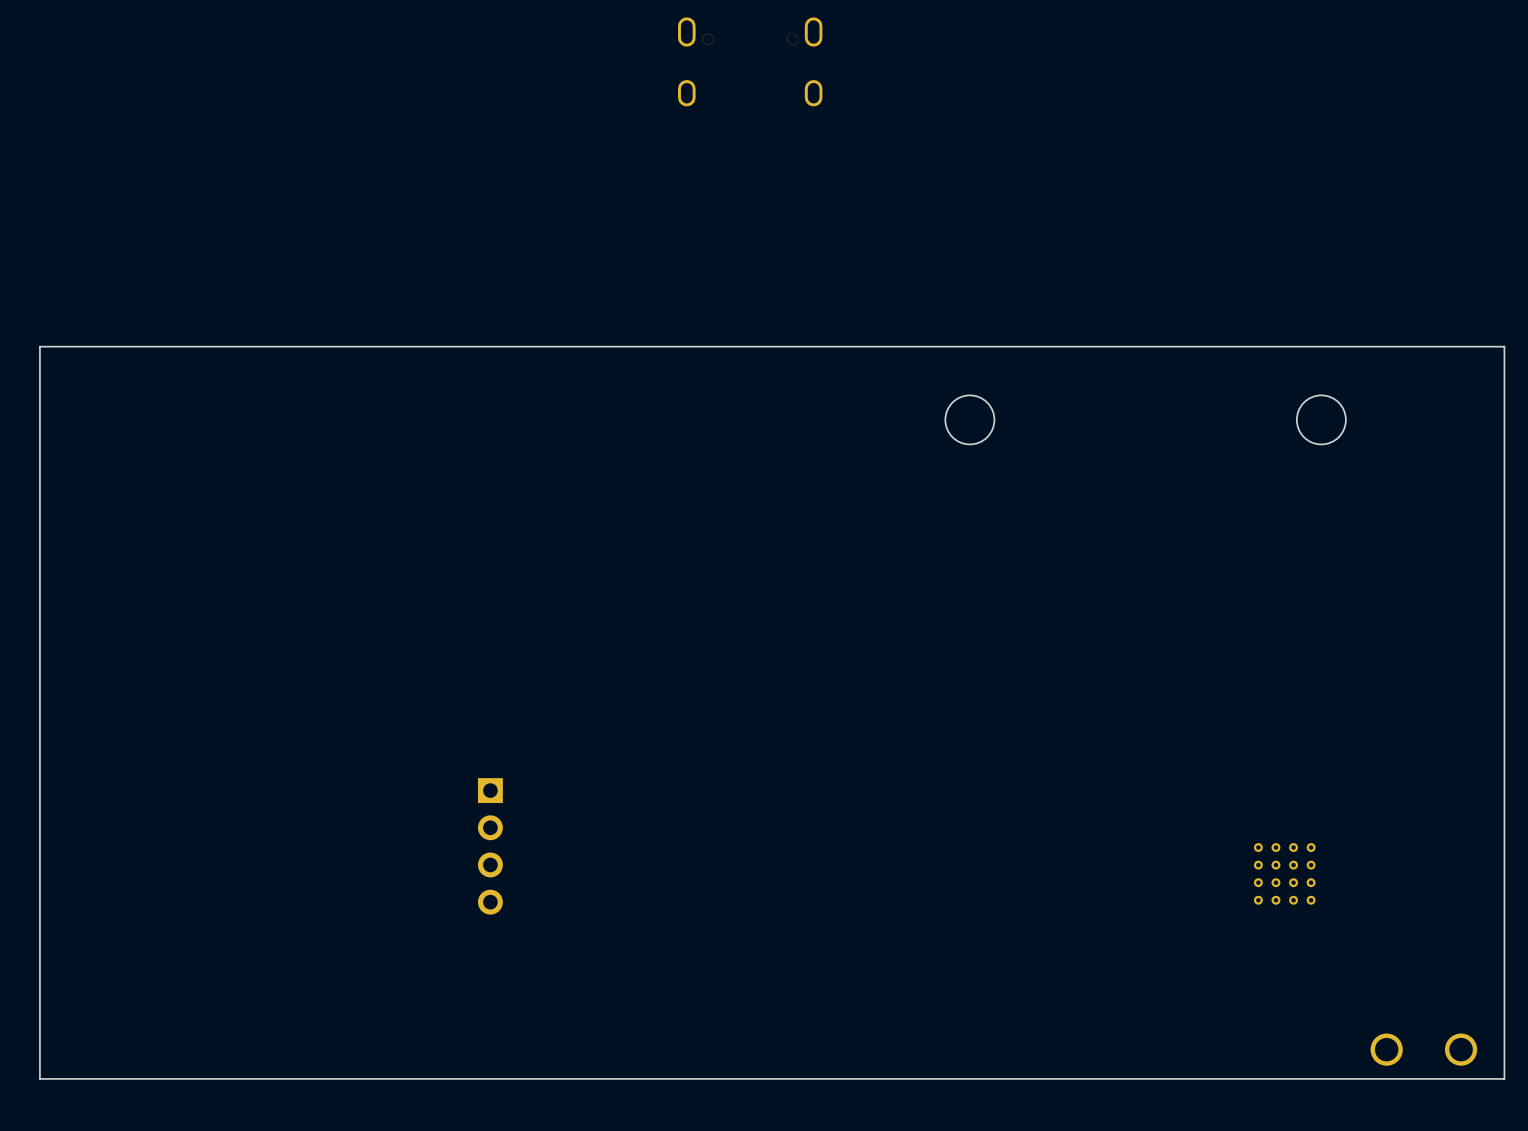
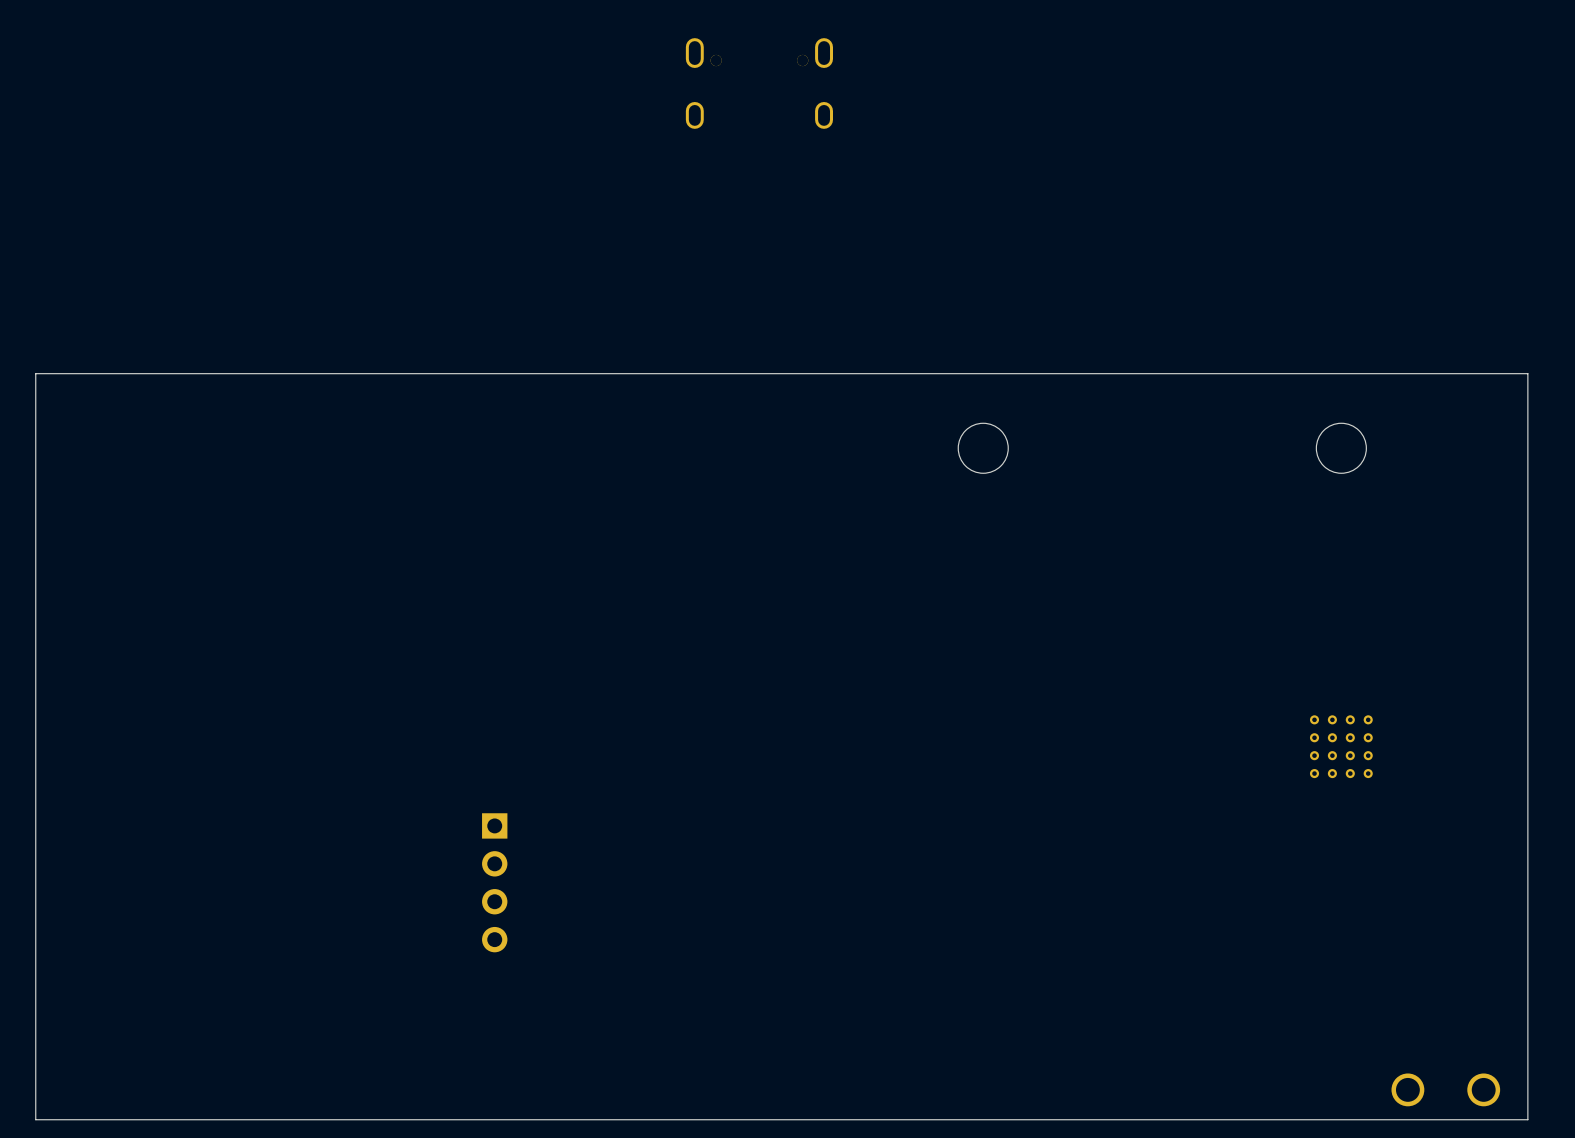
part position: (1284, 873) -> (1341, 746)

